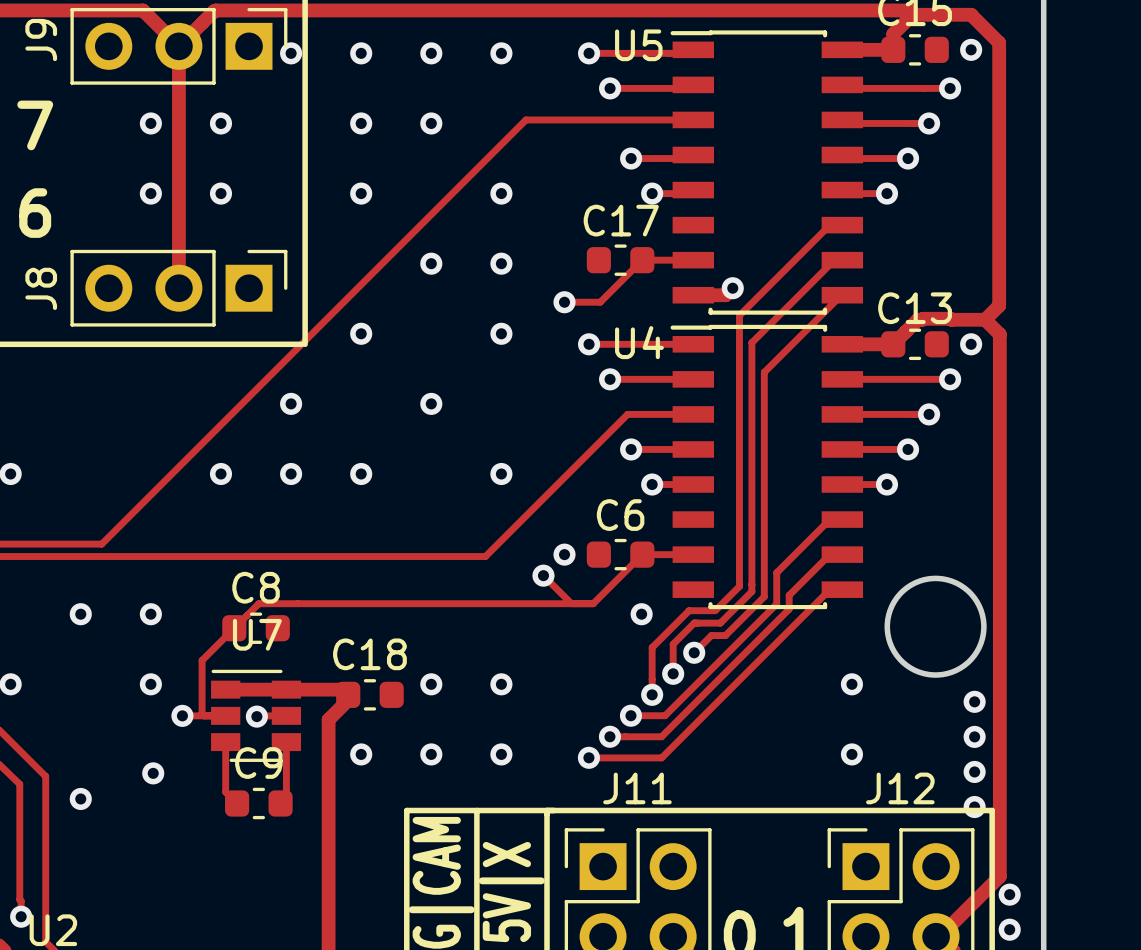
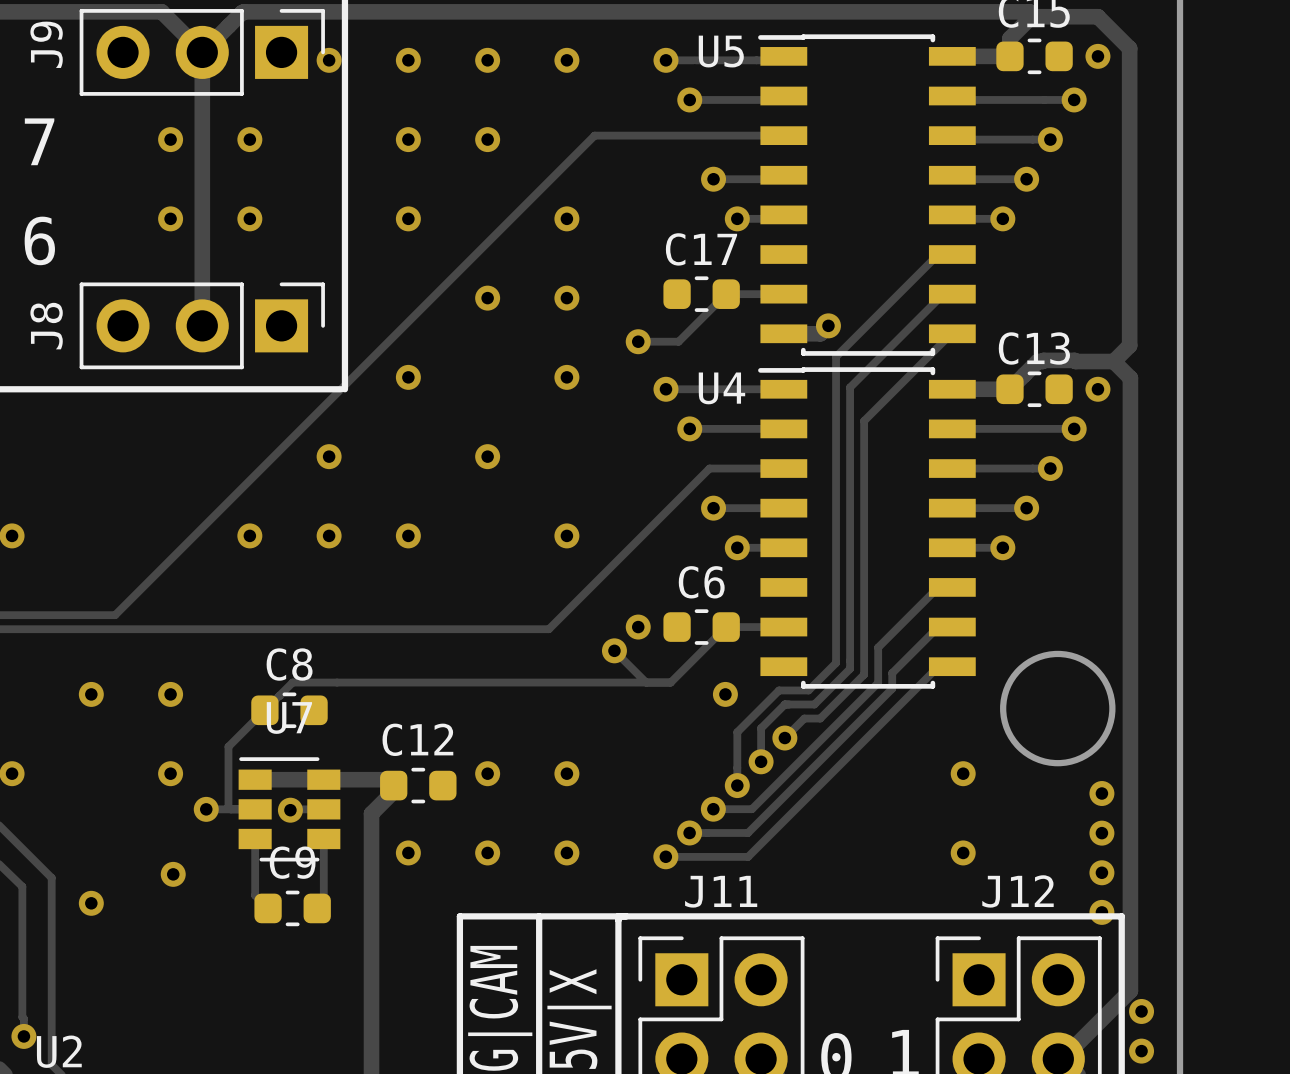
C18 name: C18 (369, 654) -> C12 (417, 739)

